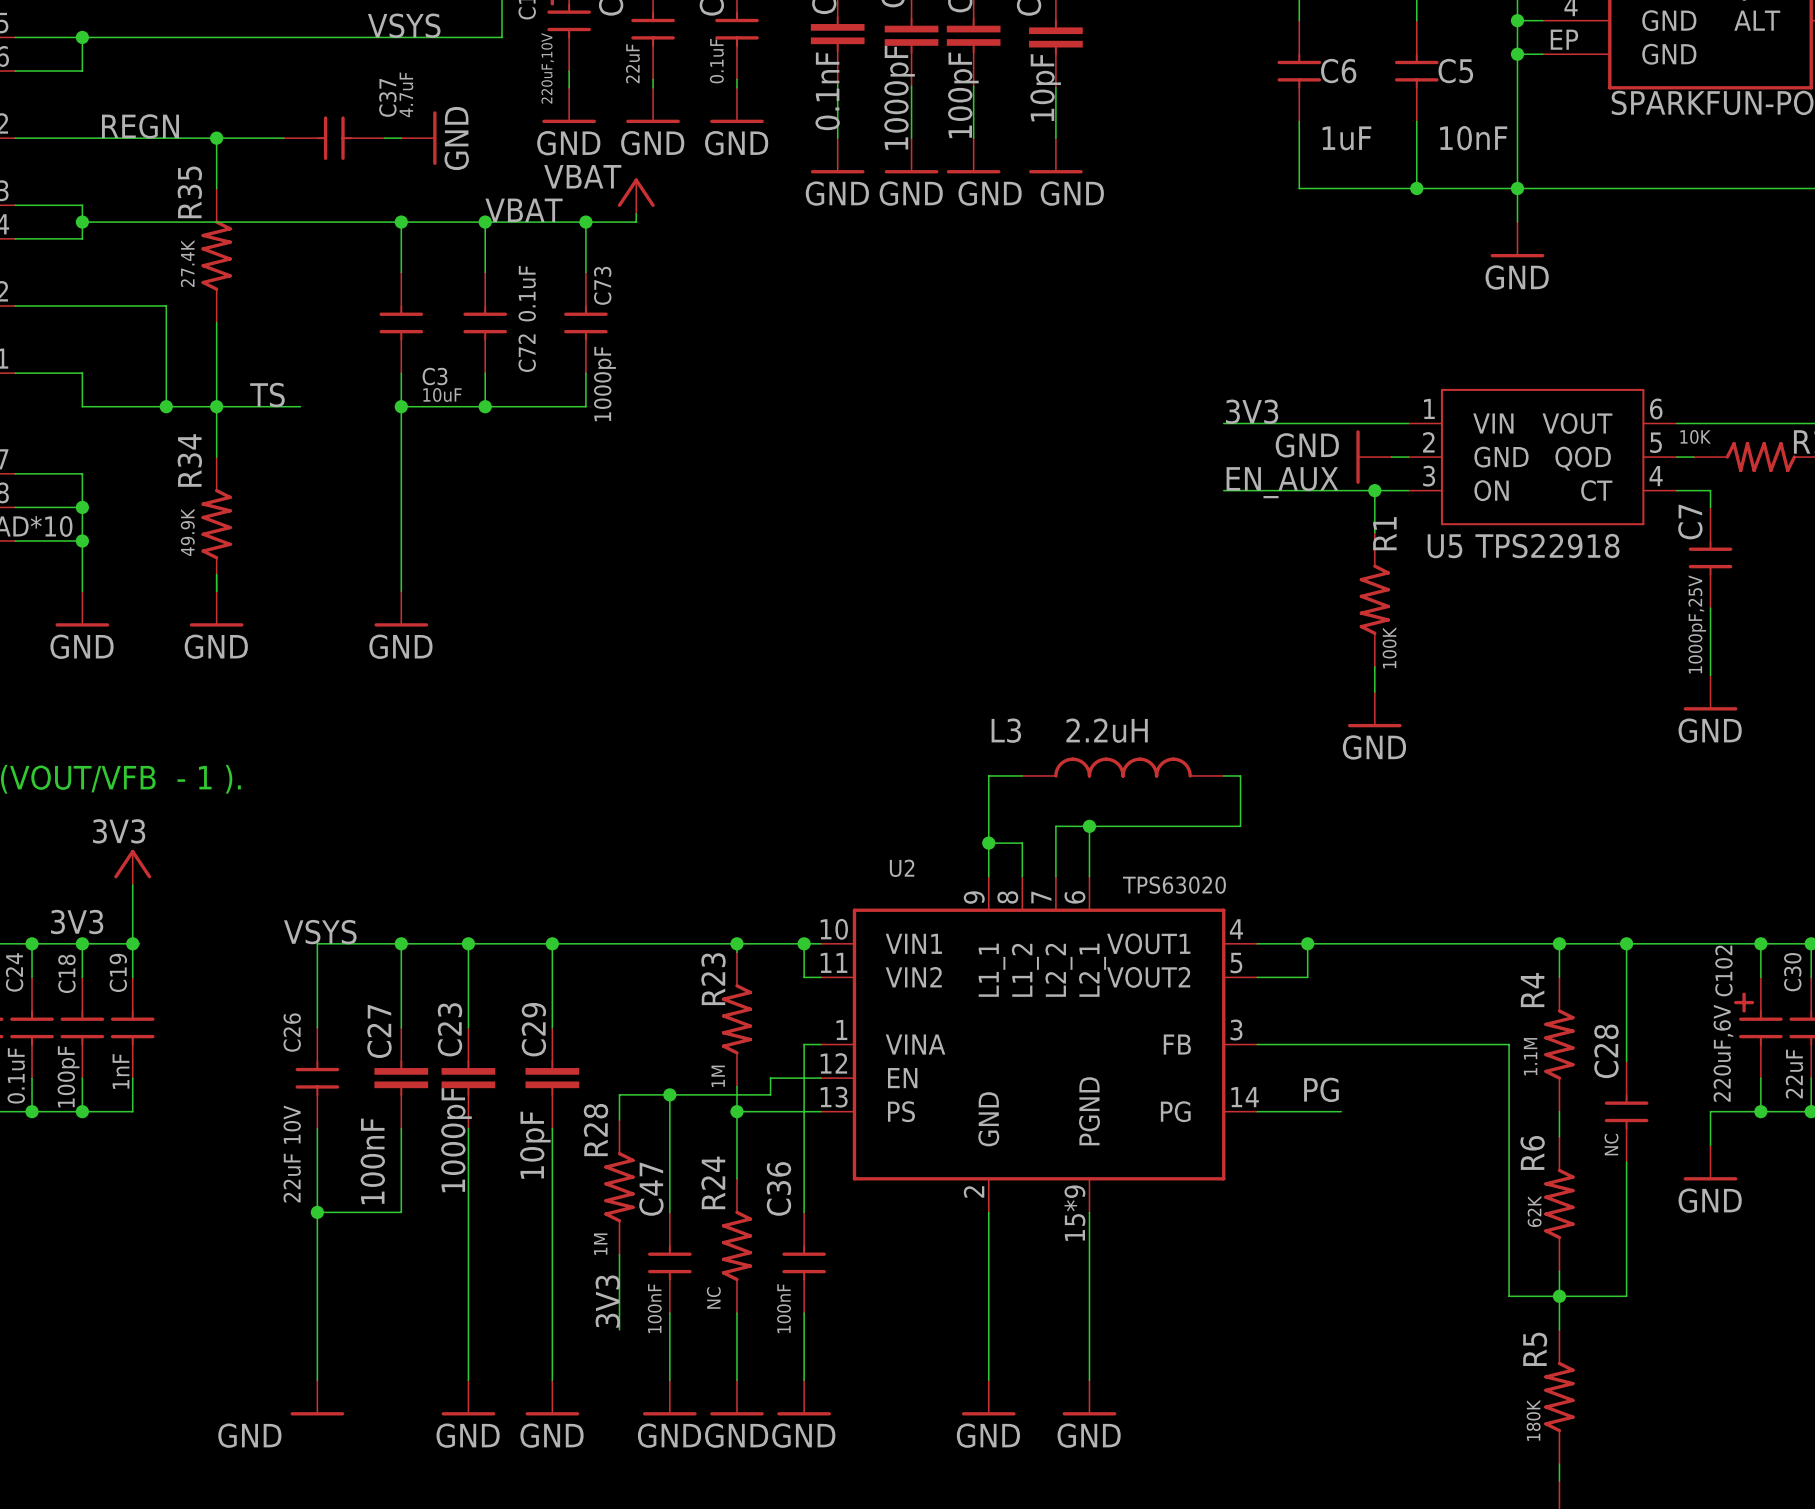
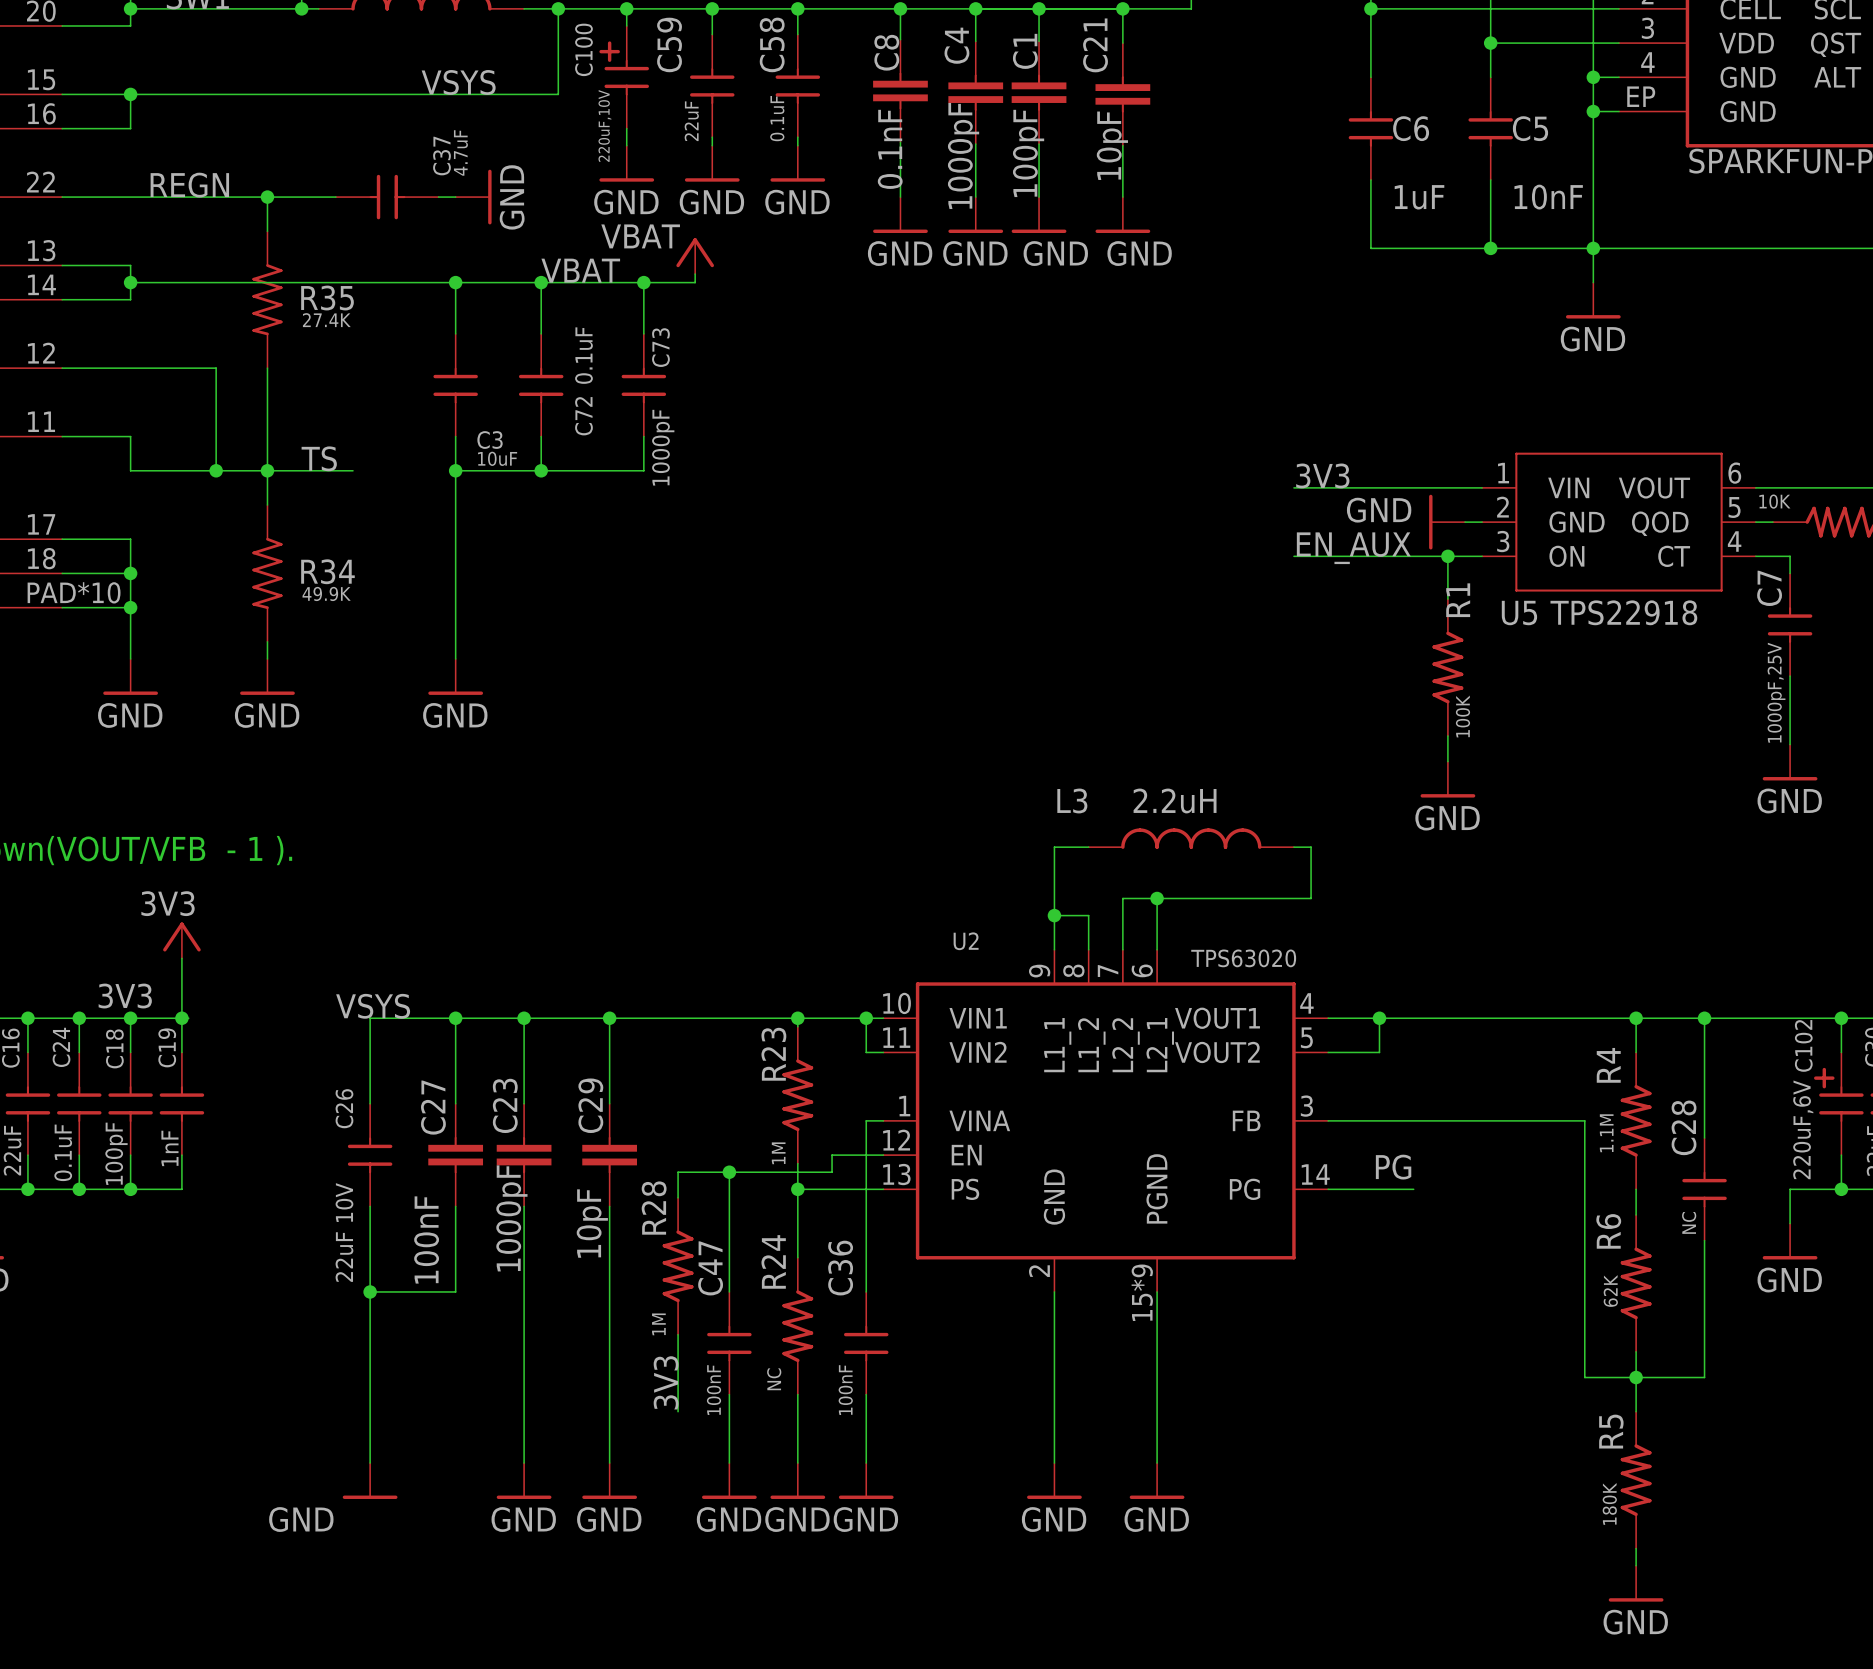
R35 symbol: [201, 188, 232, 323] -> [252, 231, 283, 369]
R35 name position: R35 (189, 192) -> R35 (327, 298)
R35 value position: 27.4K (187, 263) -> 27.4K (326, 320)
R34 symbol: [201, 457, 232, 592] -> [252, 505, 283, 642]
R34 name position: R34 (189, 460) -> R34 (327, 571)
R34 value position: 49.9K (187, 532) -> 49.9K (326, 593)

